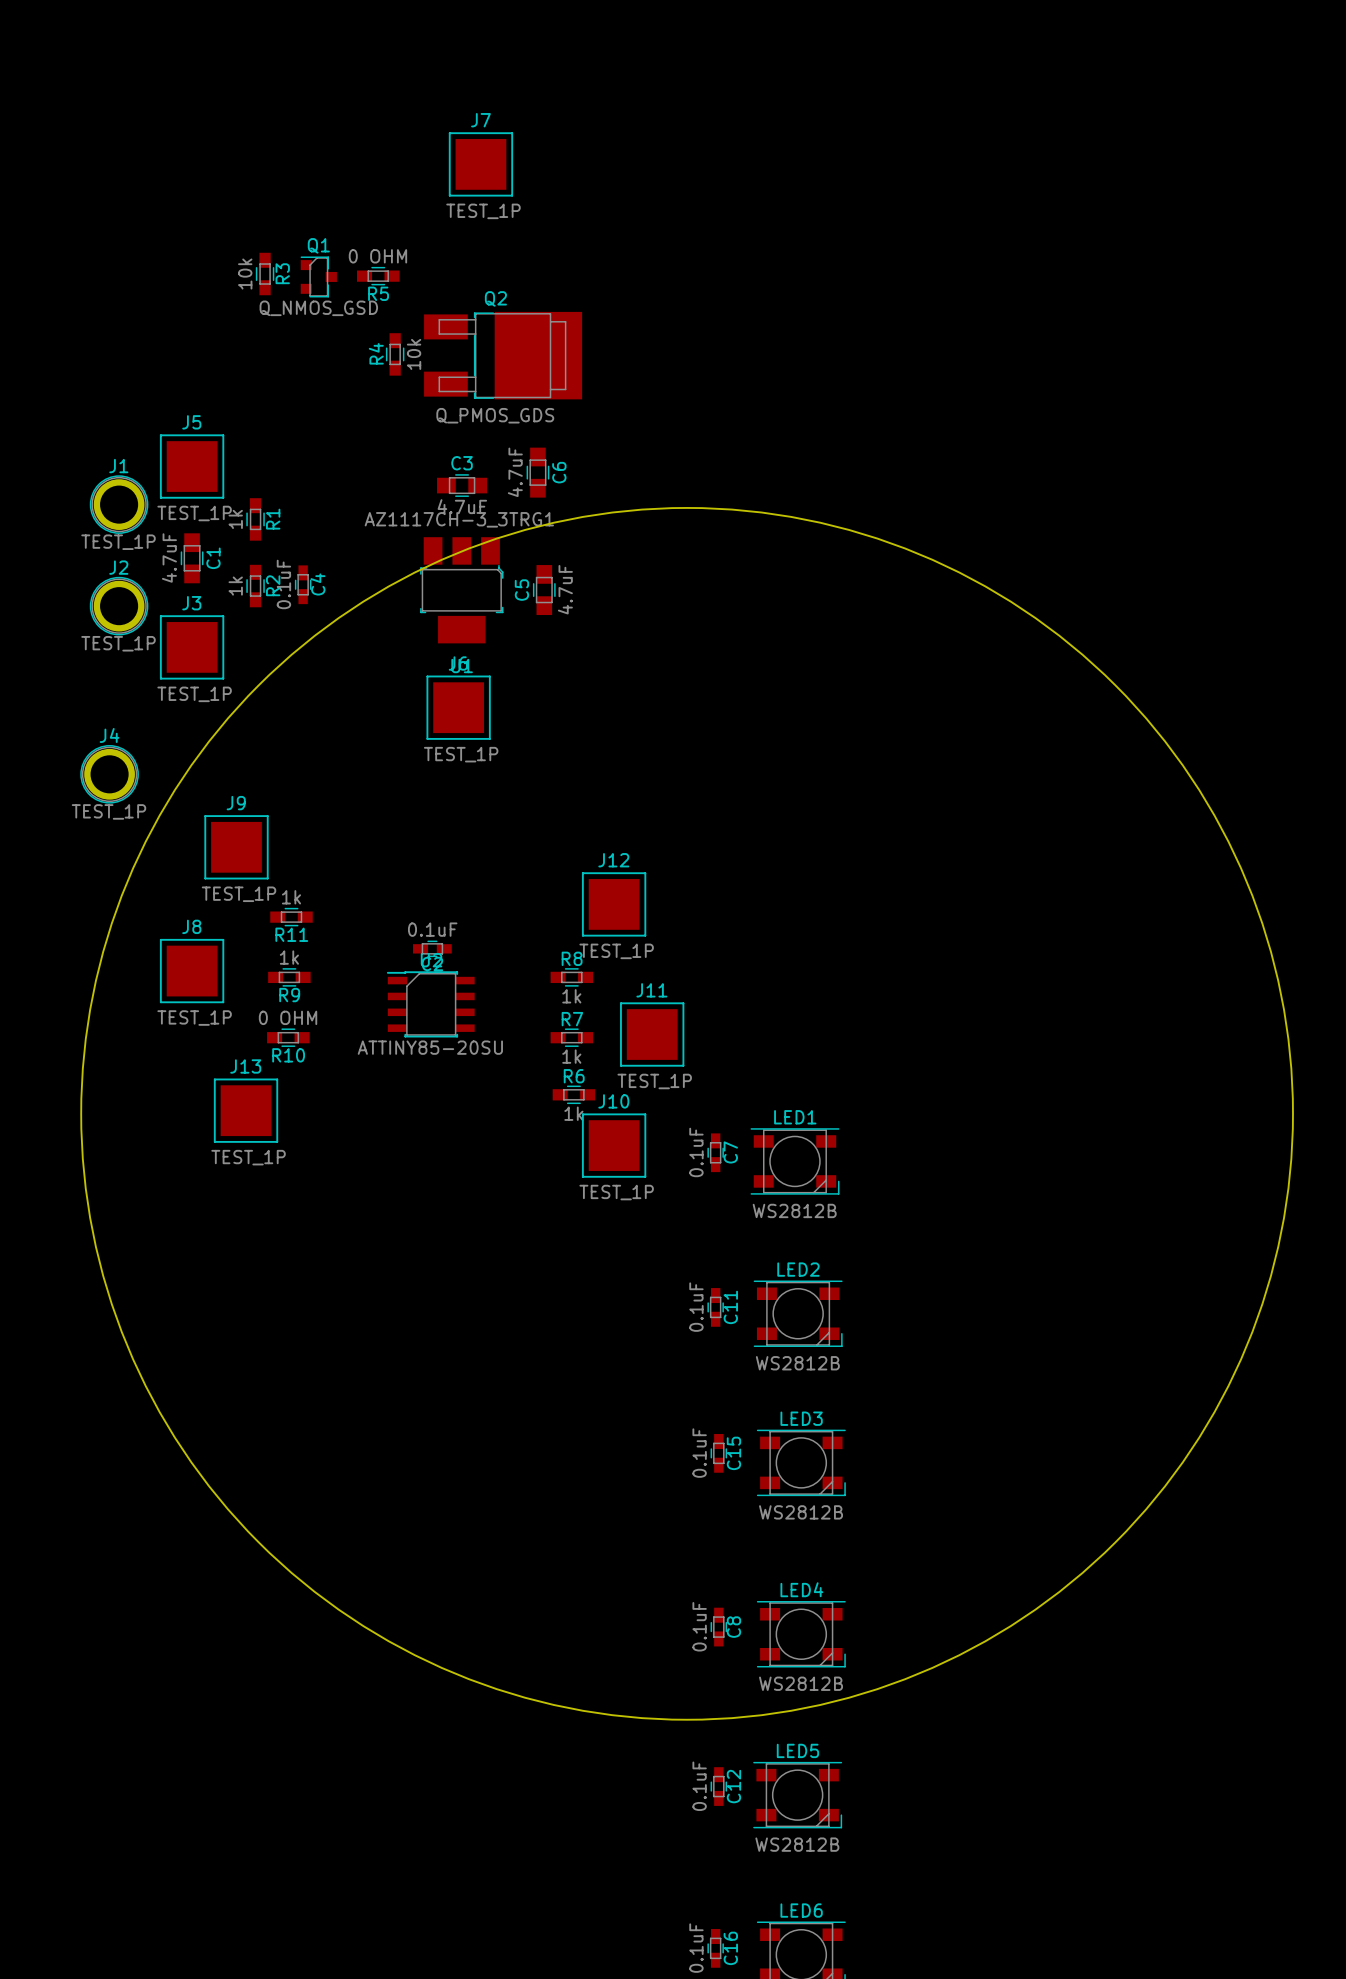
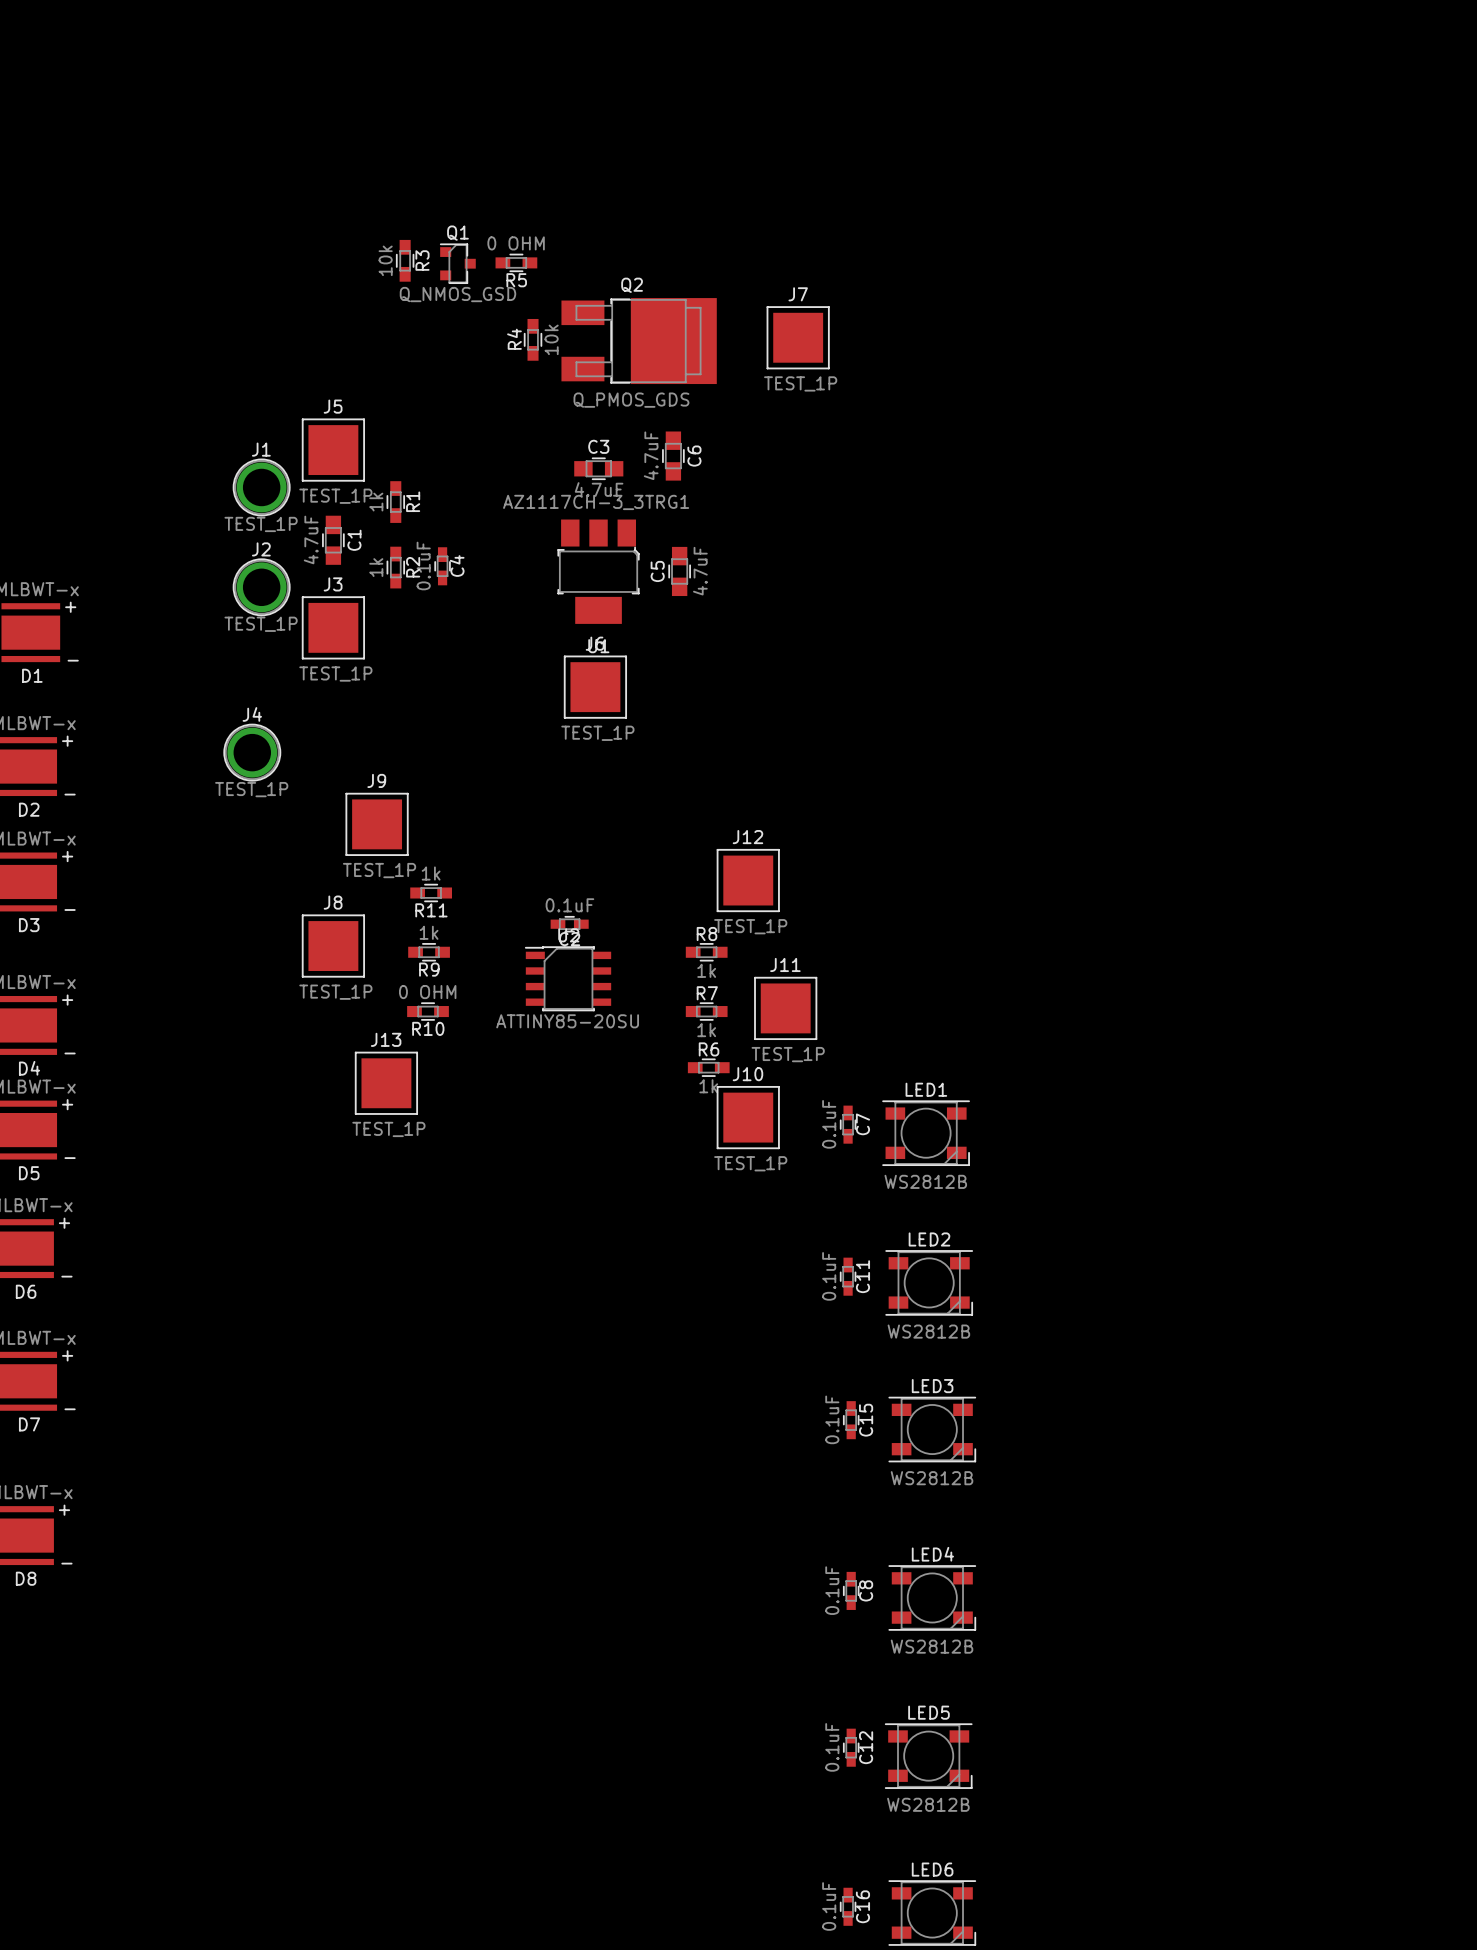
J7 position: (480, 164) -> (798, 337)
round board edge: [80, 507, 1294, 1721] -> none

